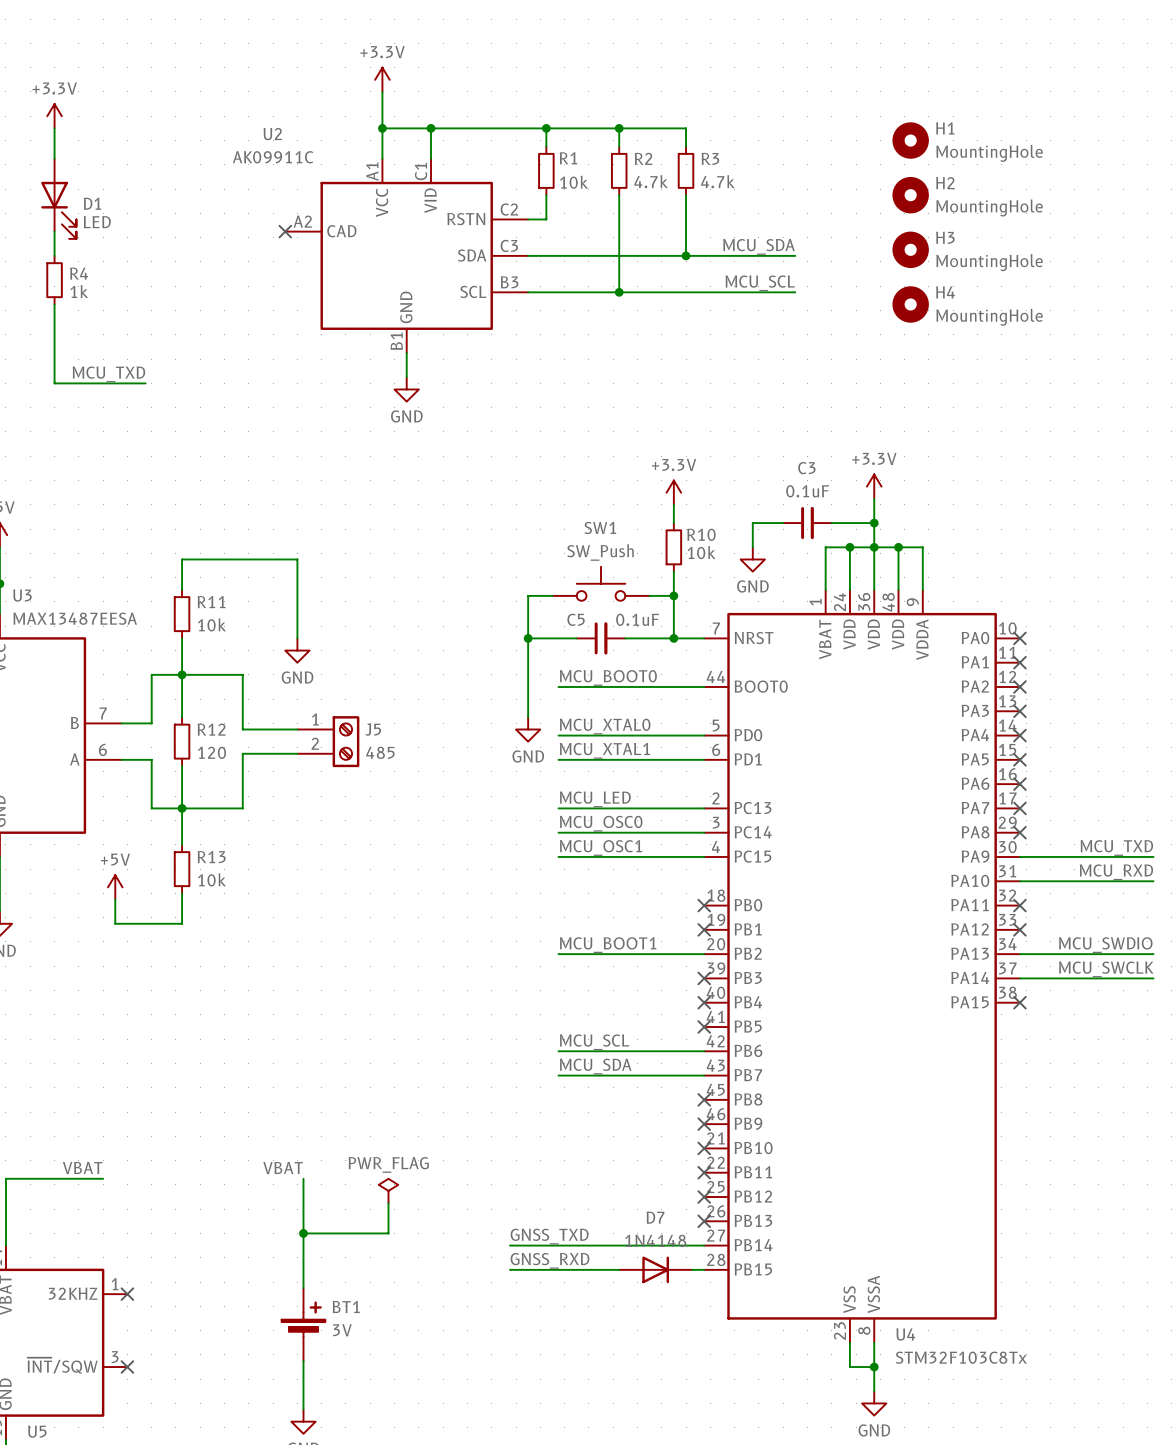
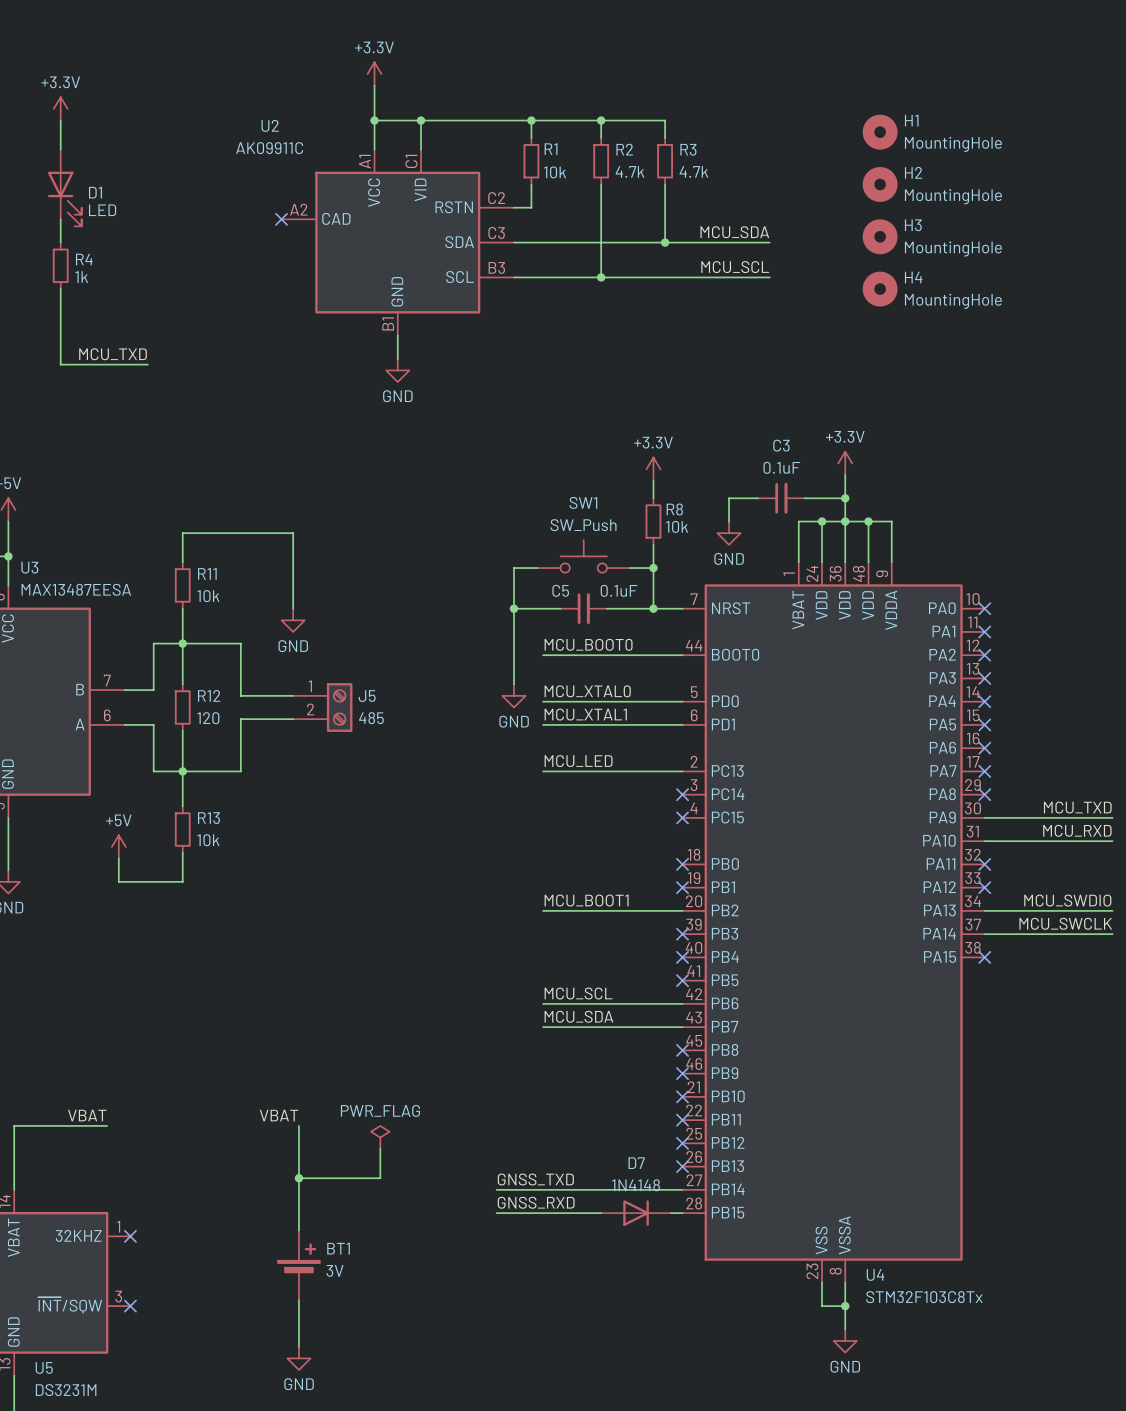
R10 name: R10 (701, 534) -> R8 (674, 509)
label: MCU_OSC0 (601, 823) -> none
wire: (558, 832) (704, 832) -> none
no-connect mark: none -> (682, 794)
label: MCU_OSC1 (600, 847) -> none
wire: (558, 856) (704, 856) -> none
no-connect mark: none -> (682, 817)

